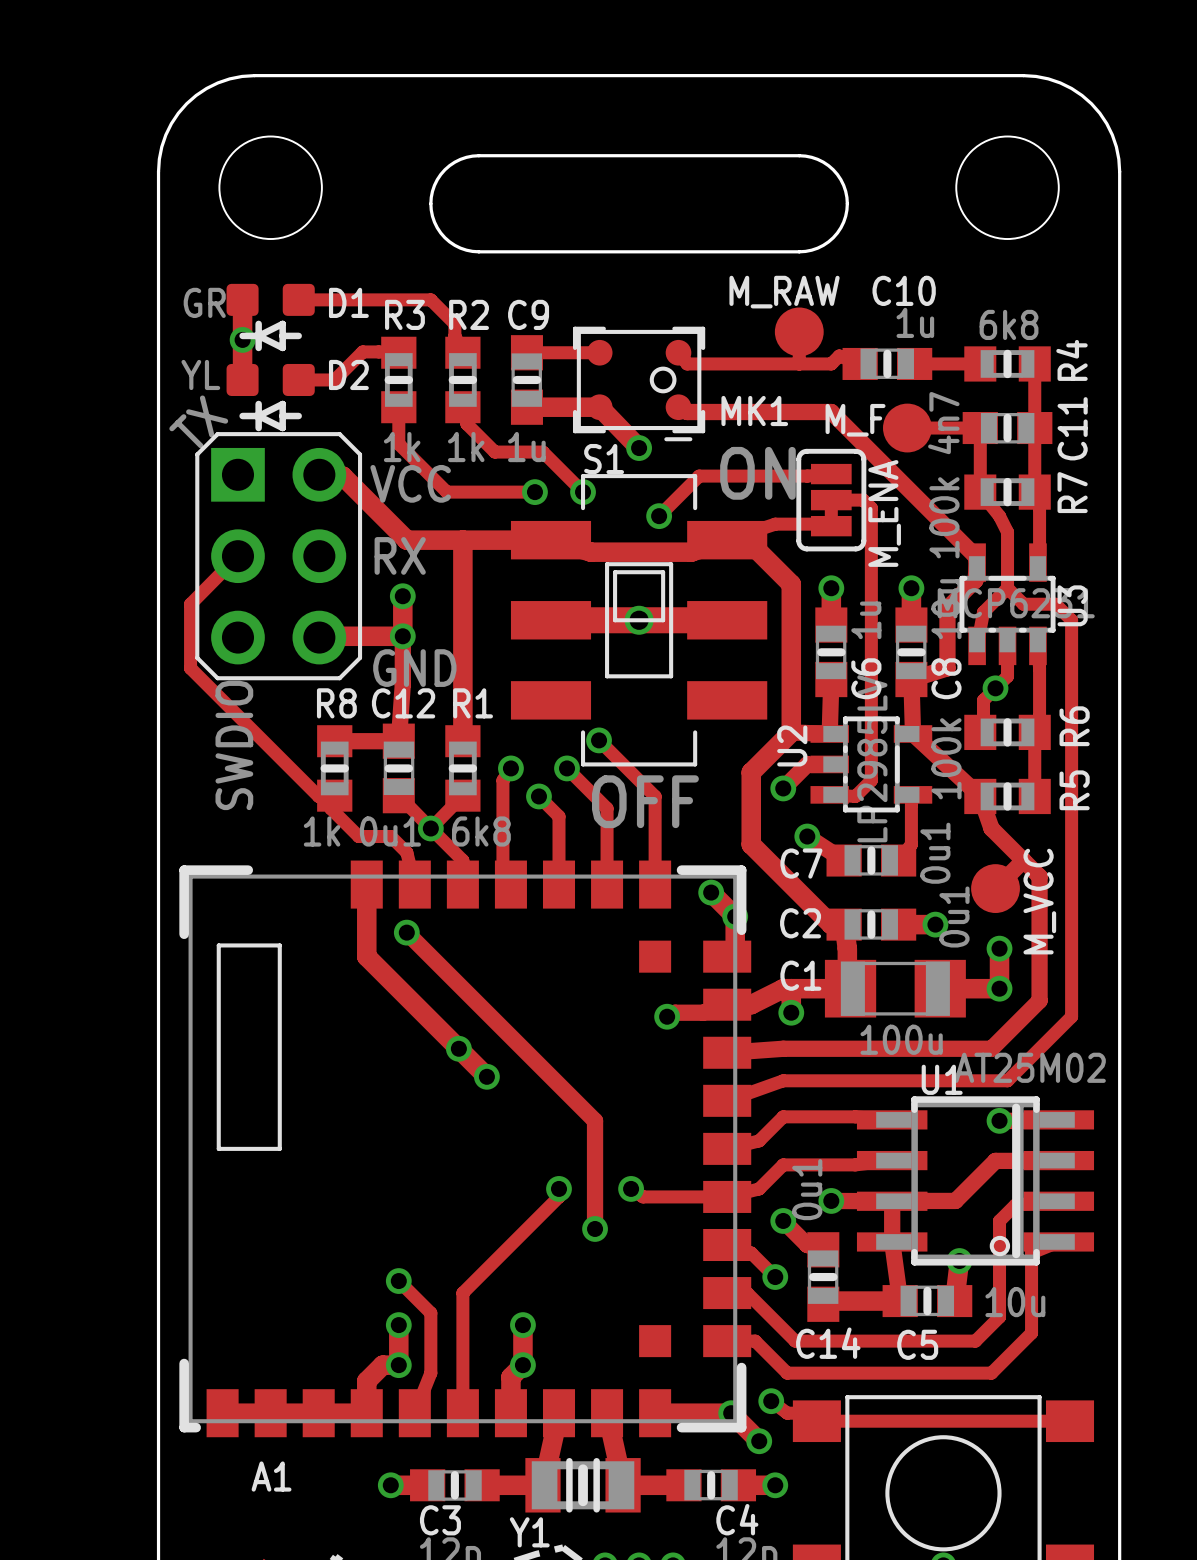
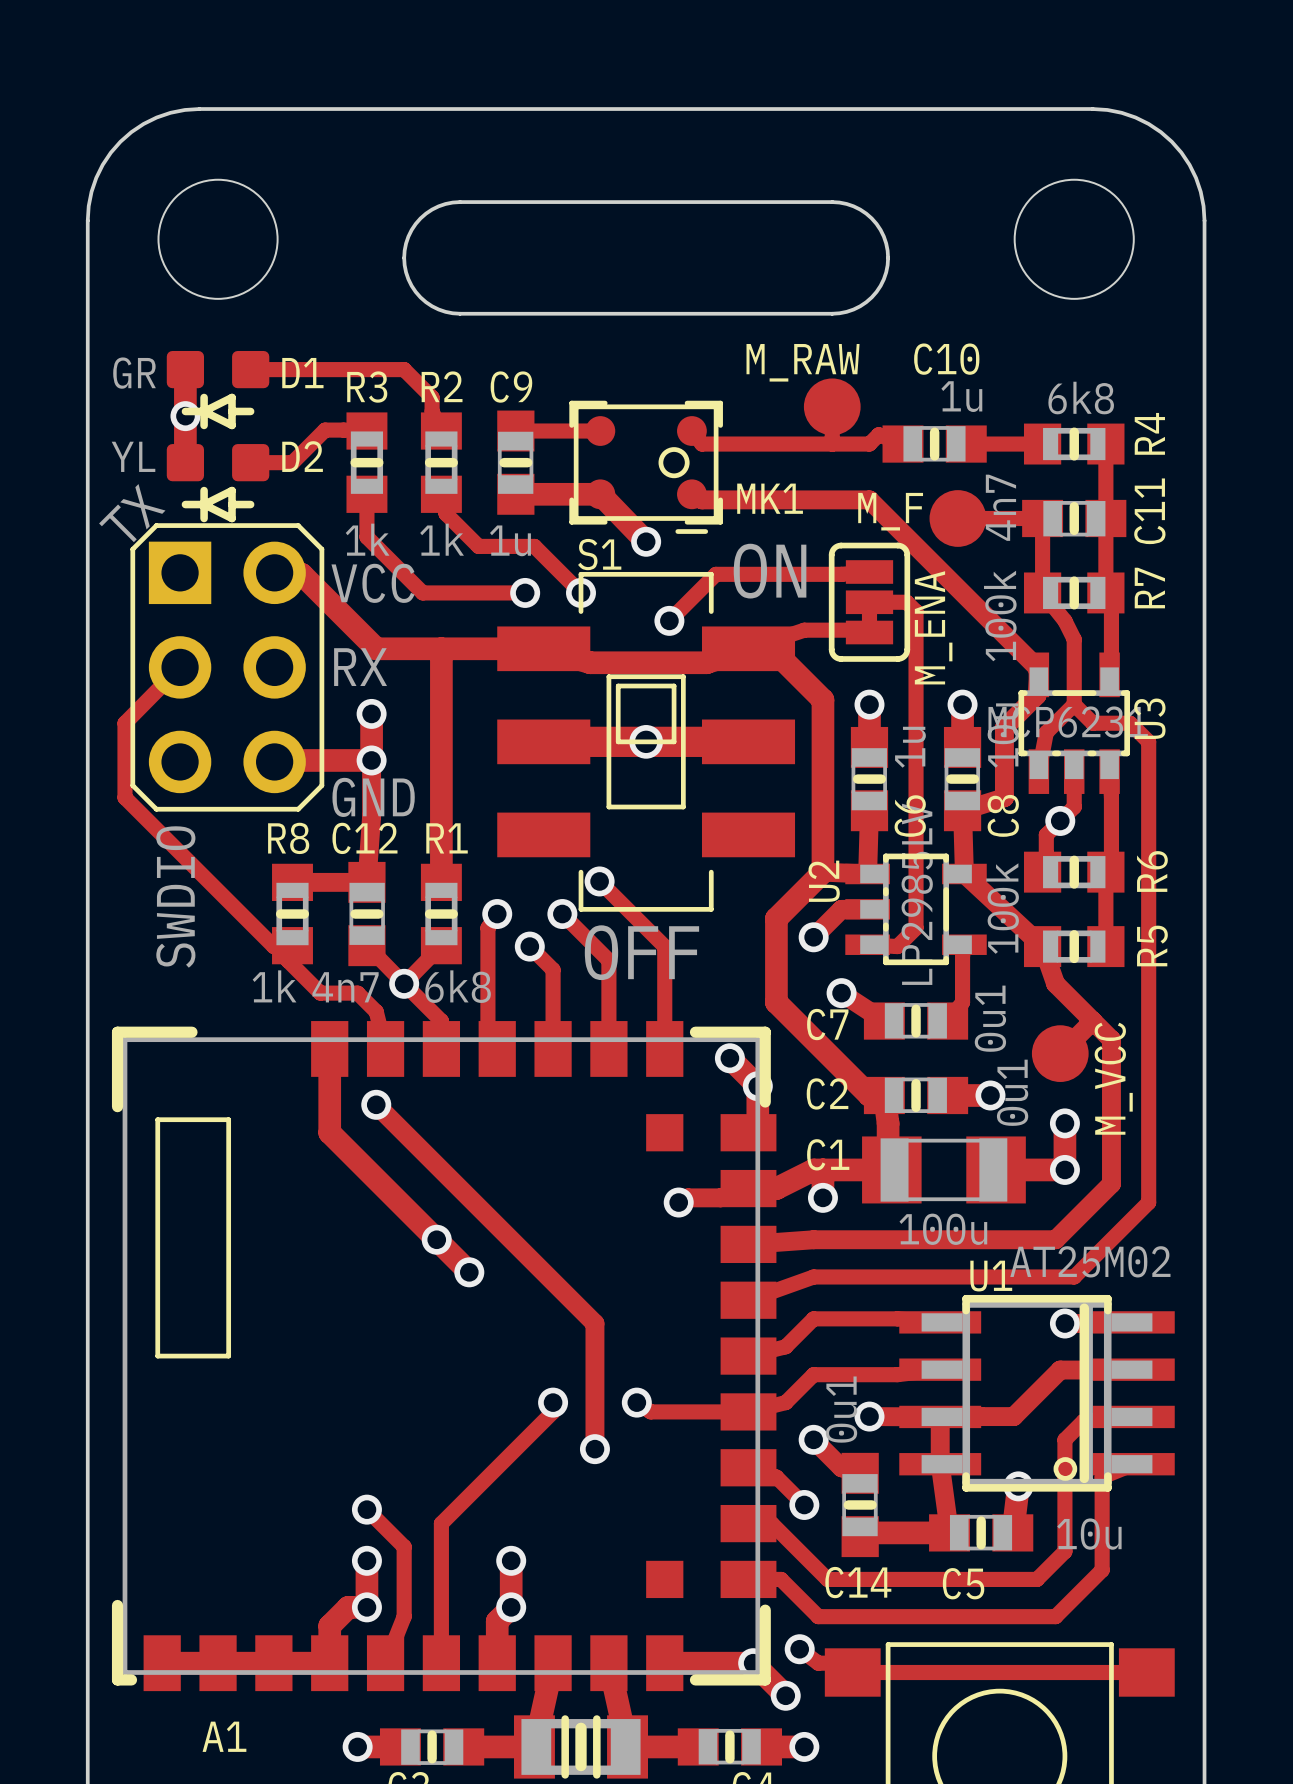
C12 value: 0u1 (390, 831) -> 4n7 (345, 987)

